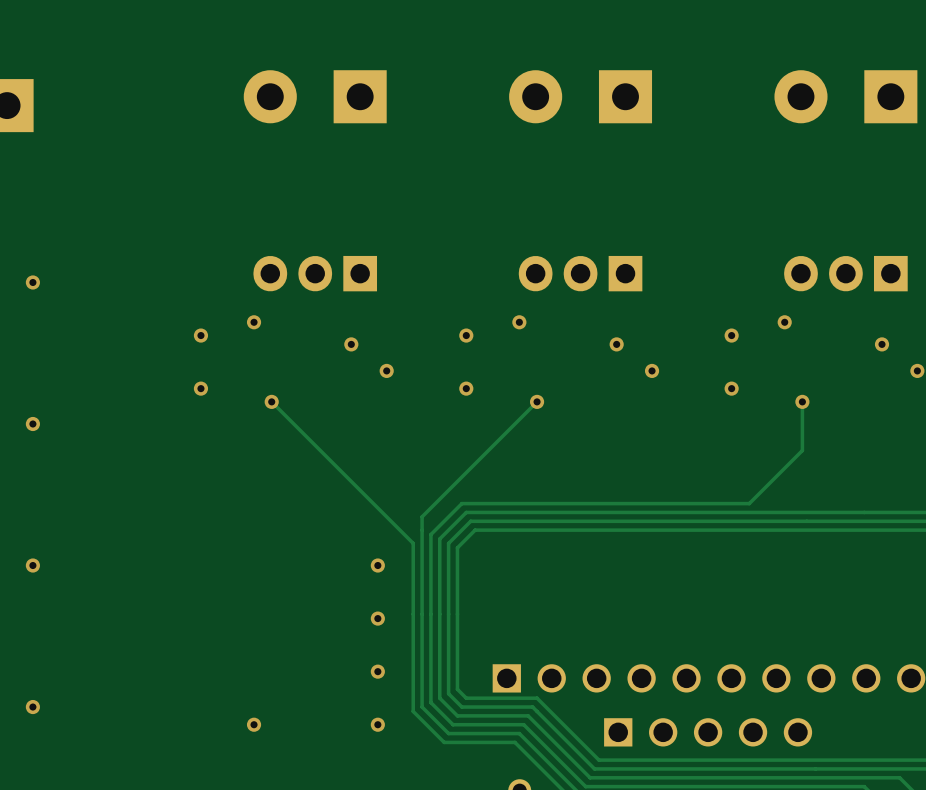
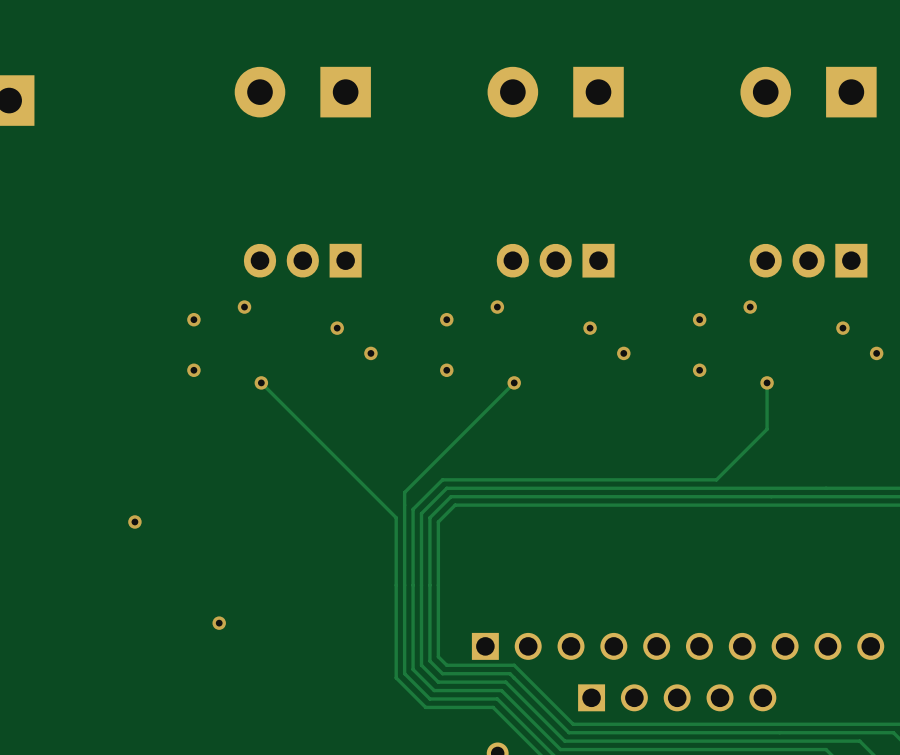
via: (32, 282) -> none
via: (32, 424) -> none
via: none -> (134, 521)
via: (32, 565) -> none
via: (377, 565) -> none
via: (377, 618) -> none
via: none -> (219, 623)
via: (377, 671) -> none
via: (32, 707) -> none
via: (254, 724) -> none
via: (377, 724) -> none

